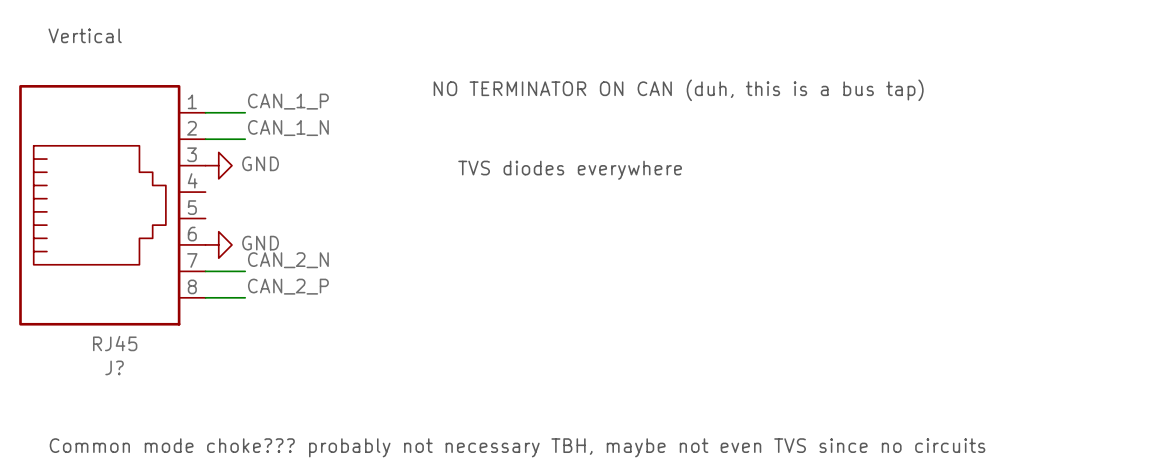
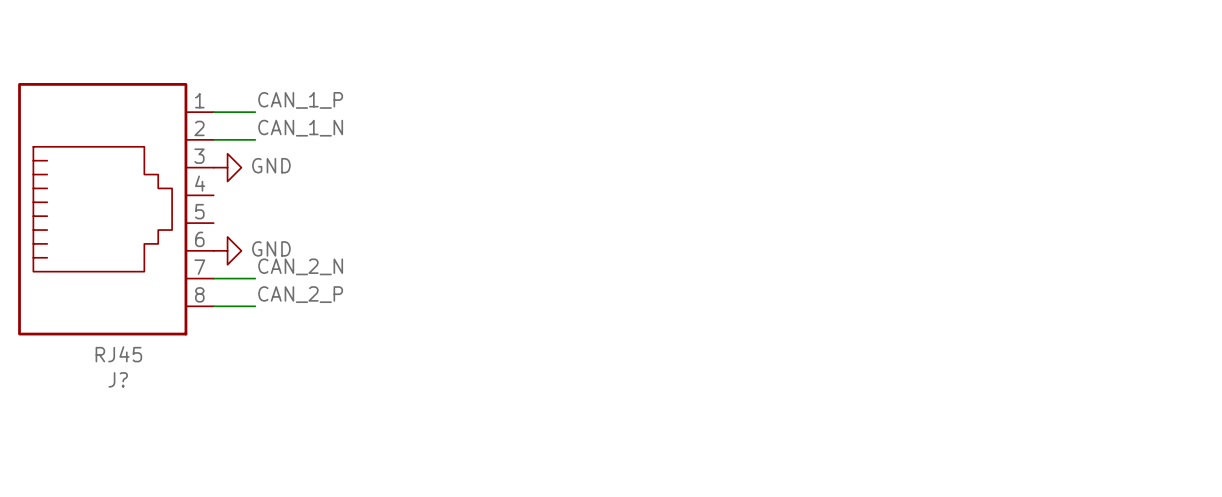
text: Vertical (85, 35) -> none
text: NO TERMINATOR ON CAN (duh, this is a bus tap) (678, 90) -> none
text: TVS diodes everywhere (570, 170) -> none
text: Common mode choke??? probably not necessary TBH, maybe not even TVS since no circuits (517, 447) -> none

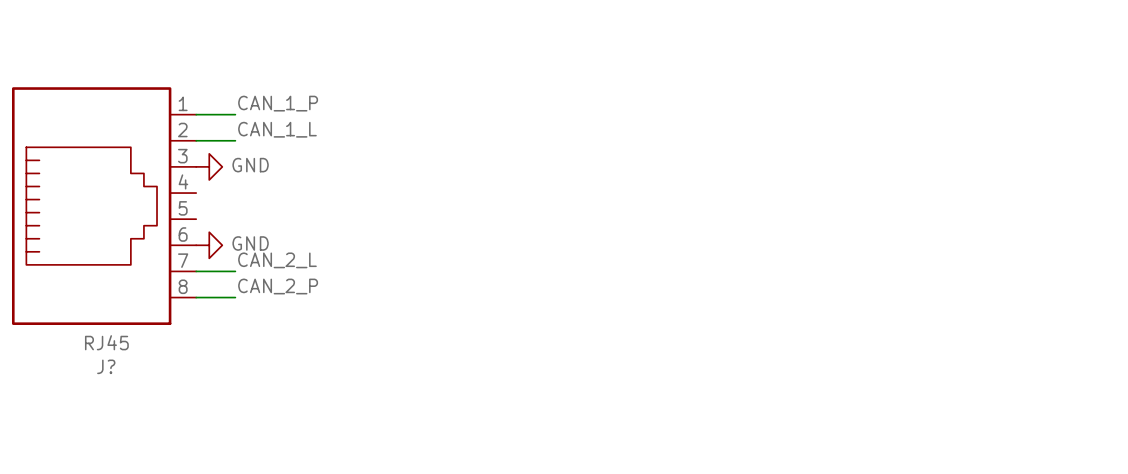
label: CAN_1_N (300, 128) -> CAN_1_L (277, 129)
label: CAN_2_N (300, 266) -> CAN_2_L (277, 260)

